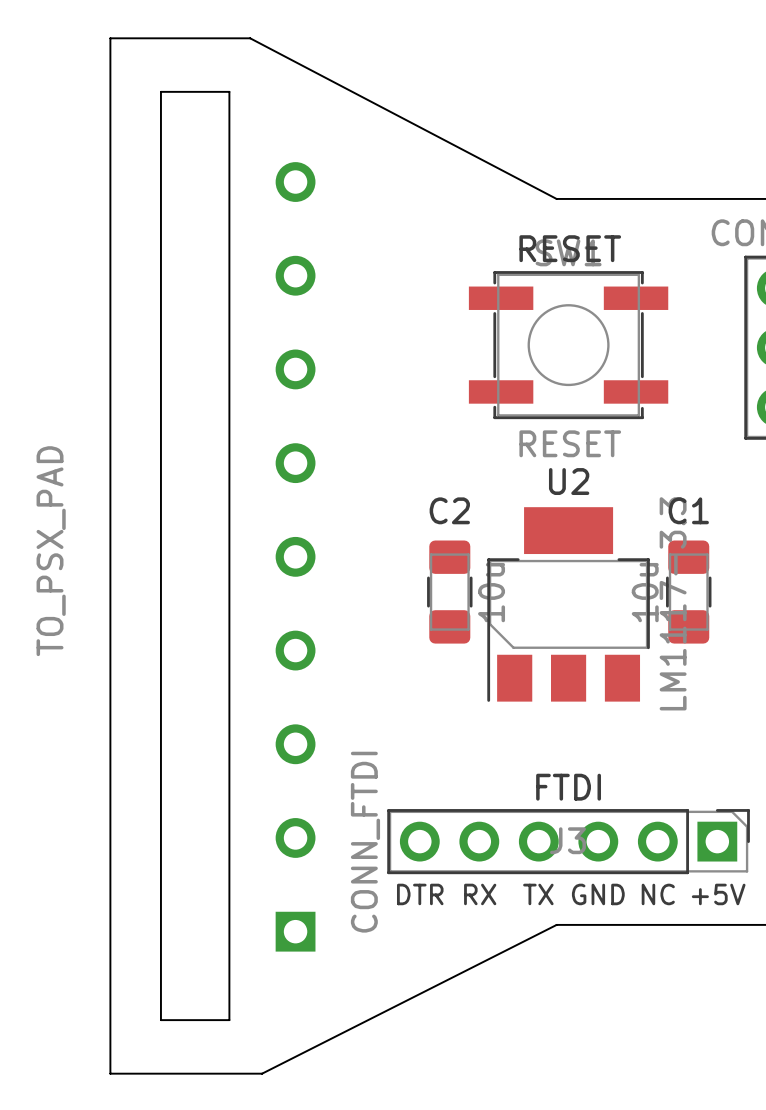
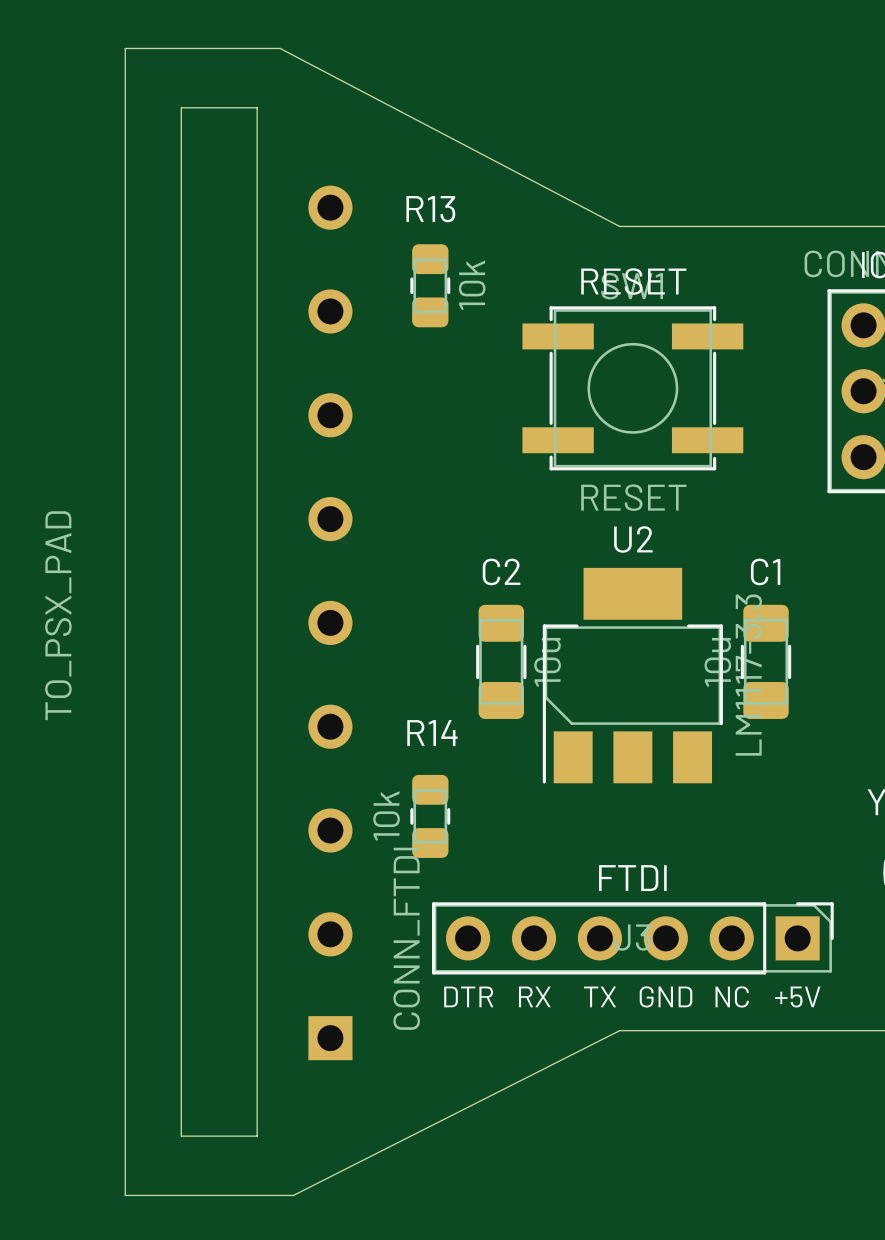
R13: none -> 10k (430, 285)
R14: none -> 10k (430, 816)

